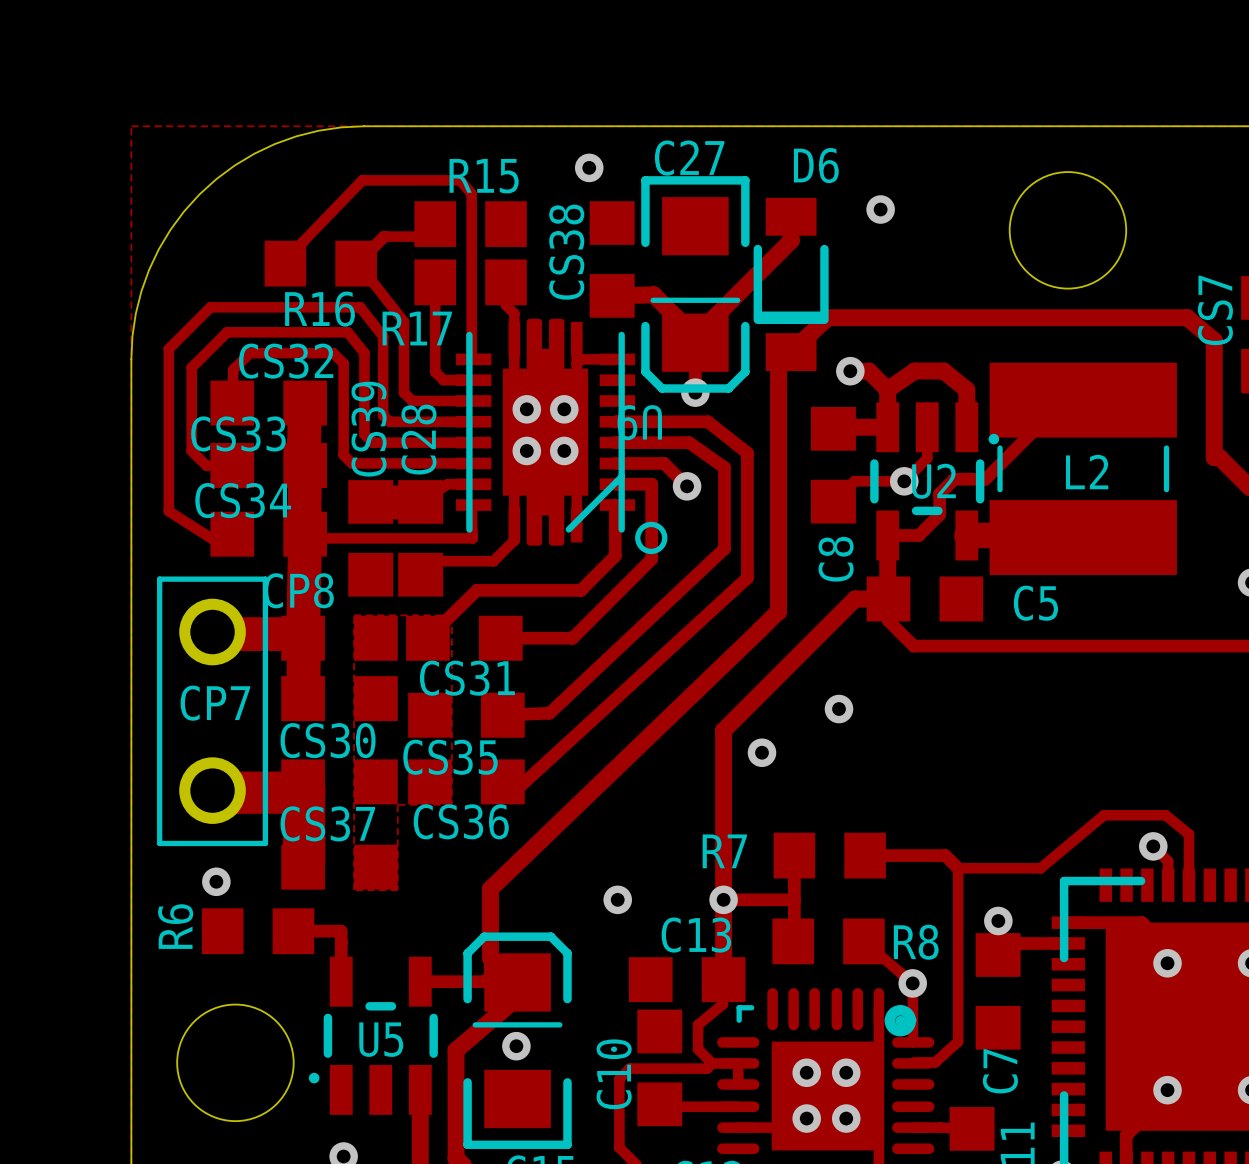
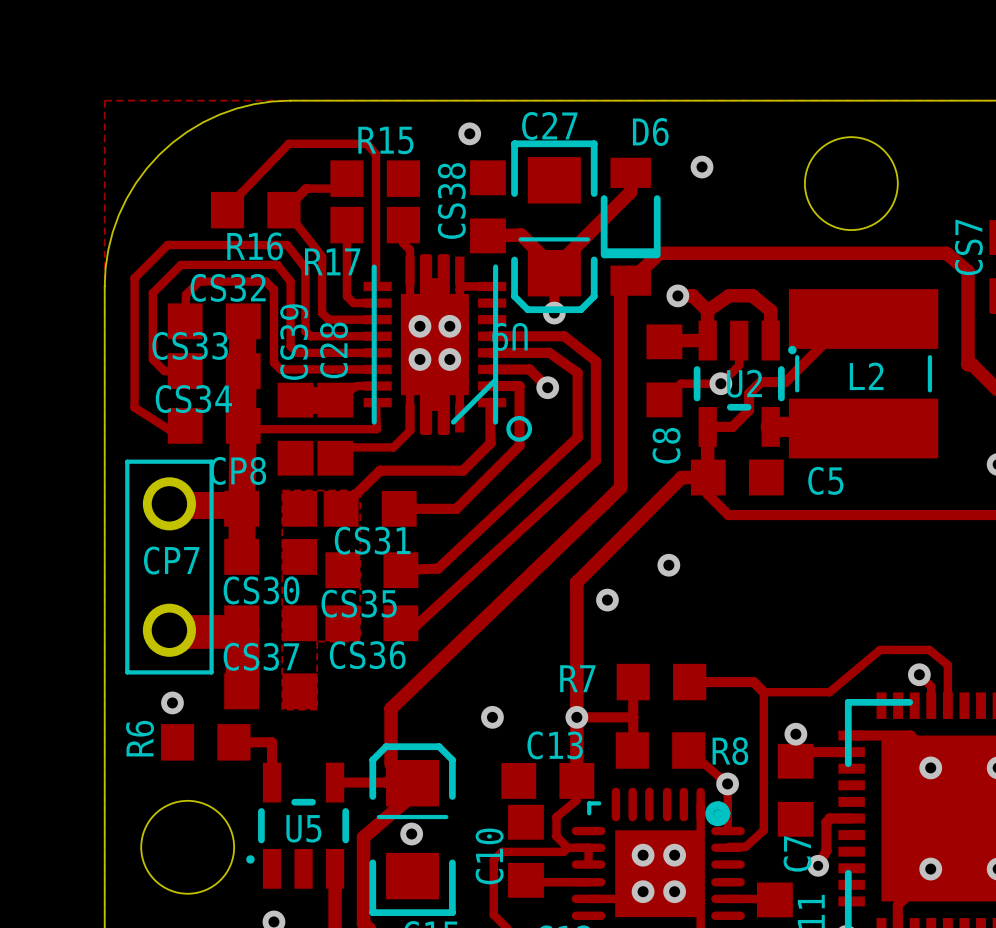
track: none -> (851, 818) (829, 818) (826, 822) (826, 850) (818, 865)
via: none -> (818, 865)

